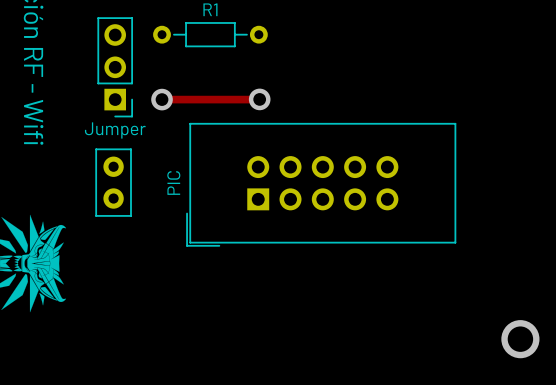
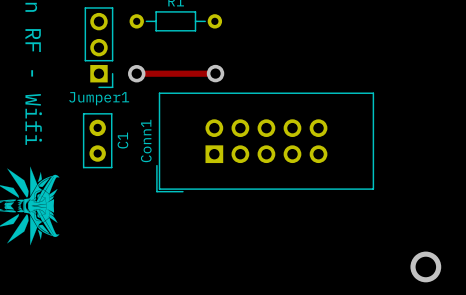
Jumper name: Jumper (115, 130) -> Jumper1 (99, 98)
C1 name: none -> C1 (122, 140)
PIC name: PIC (173, 183) -> Conn1 (146, 141)

